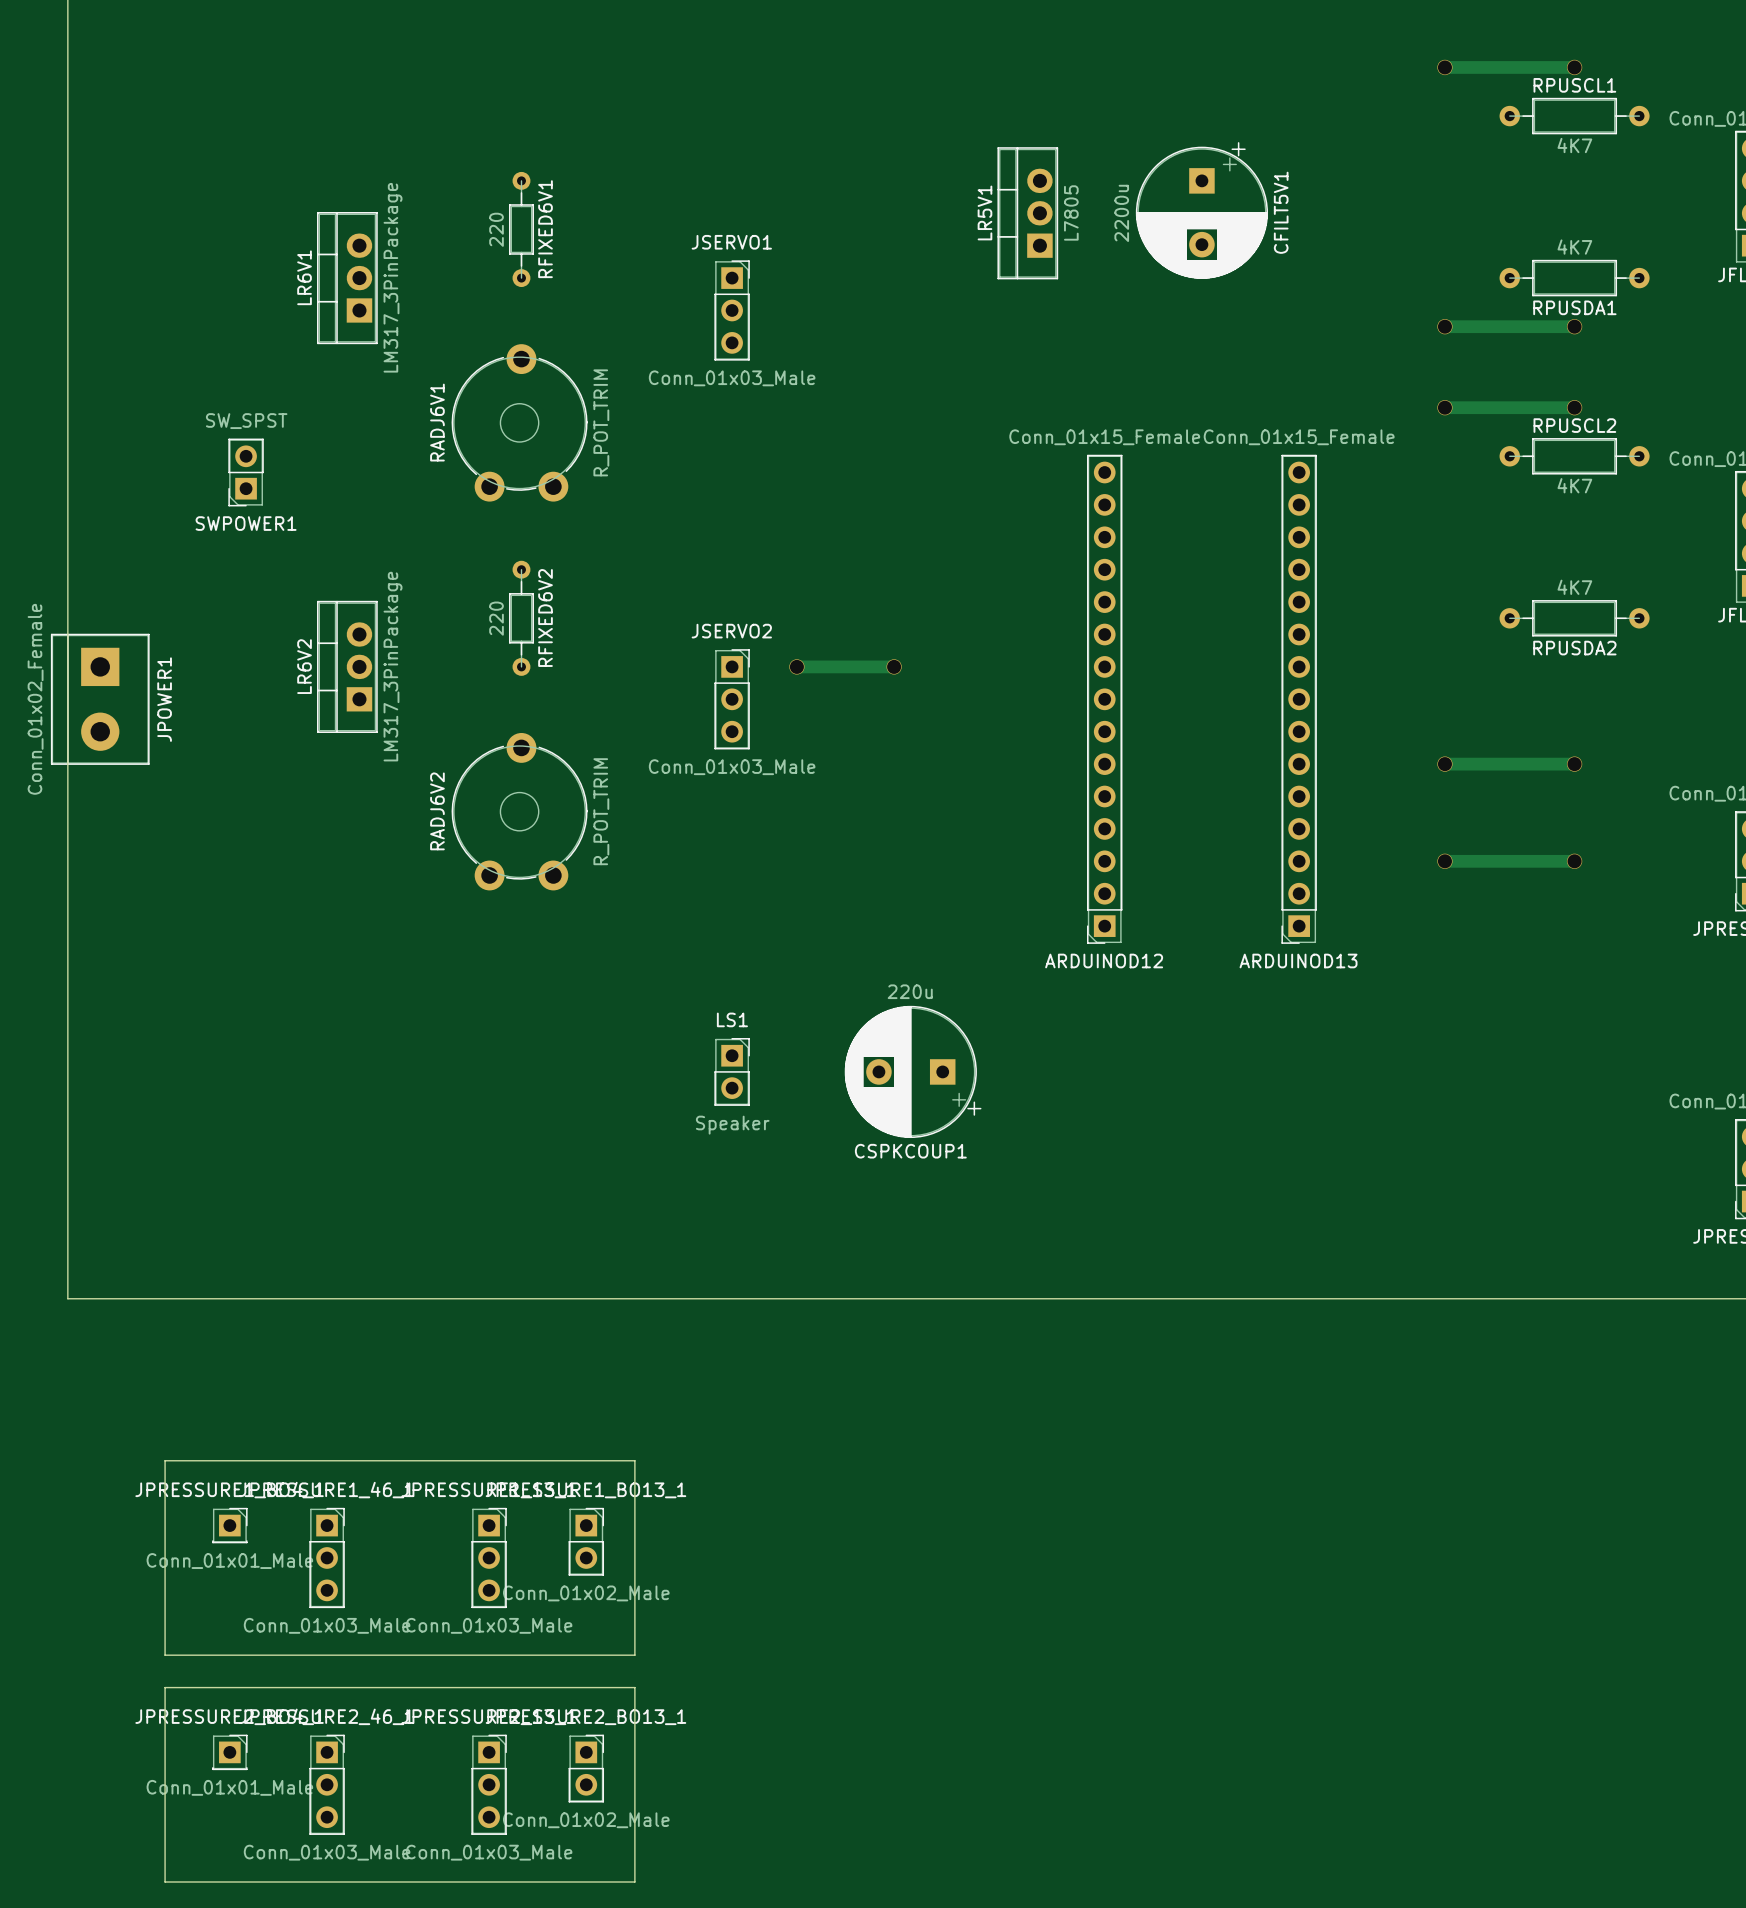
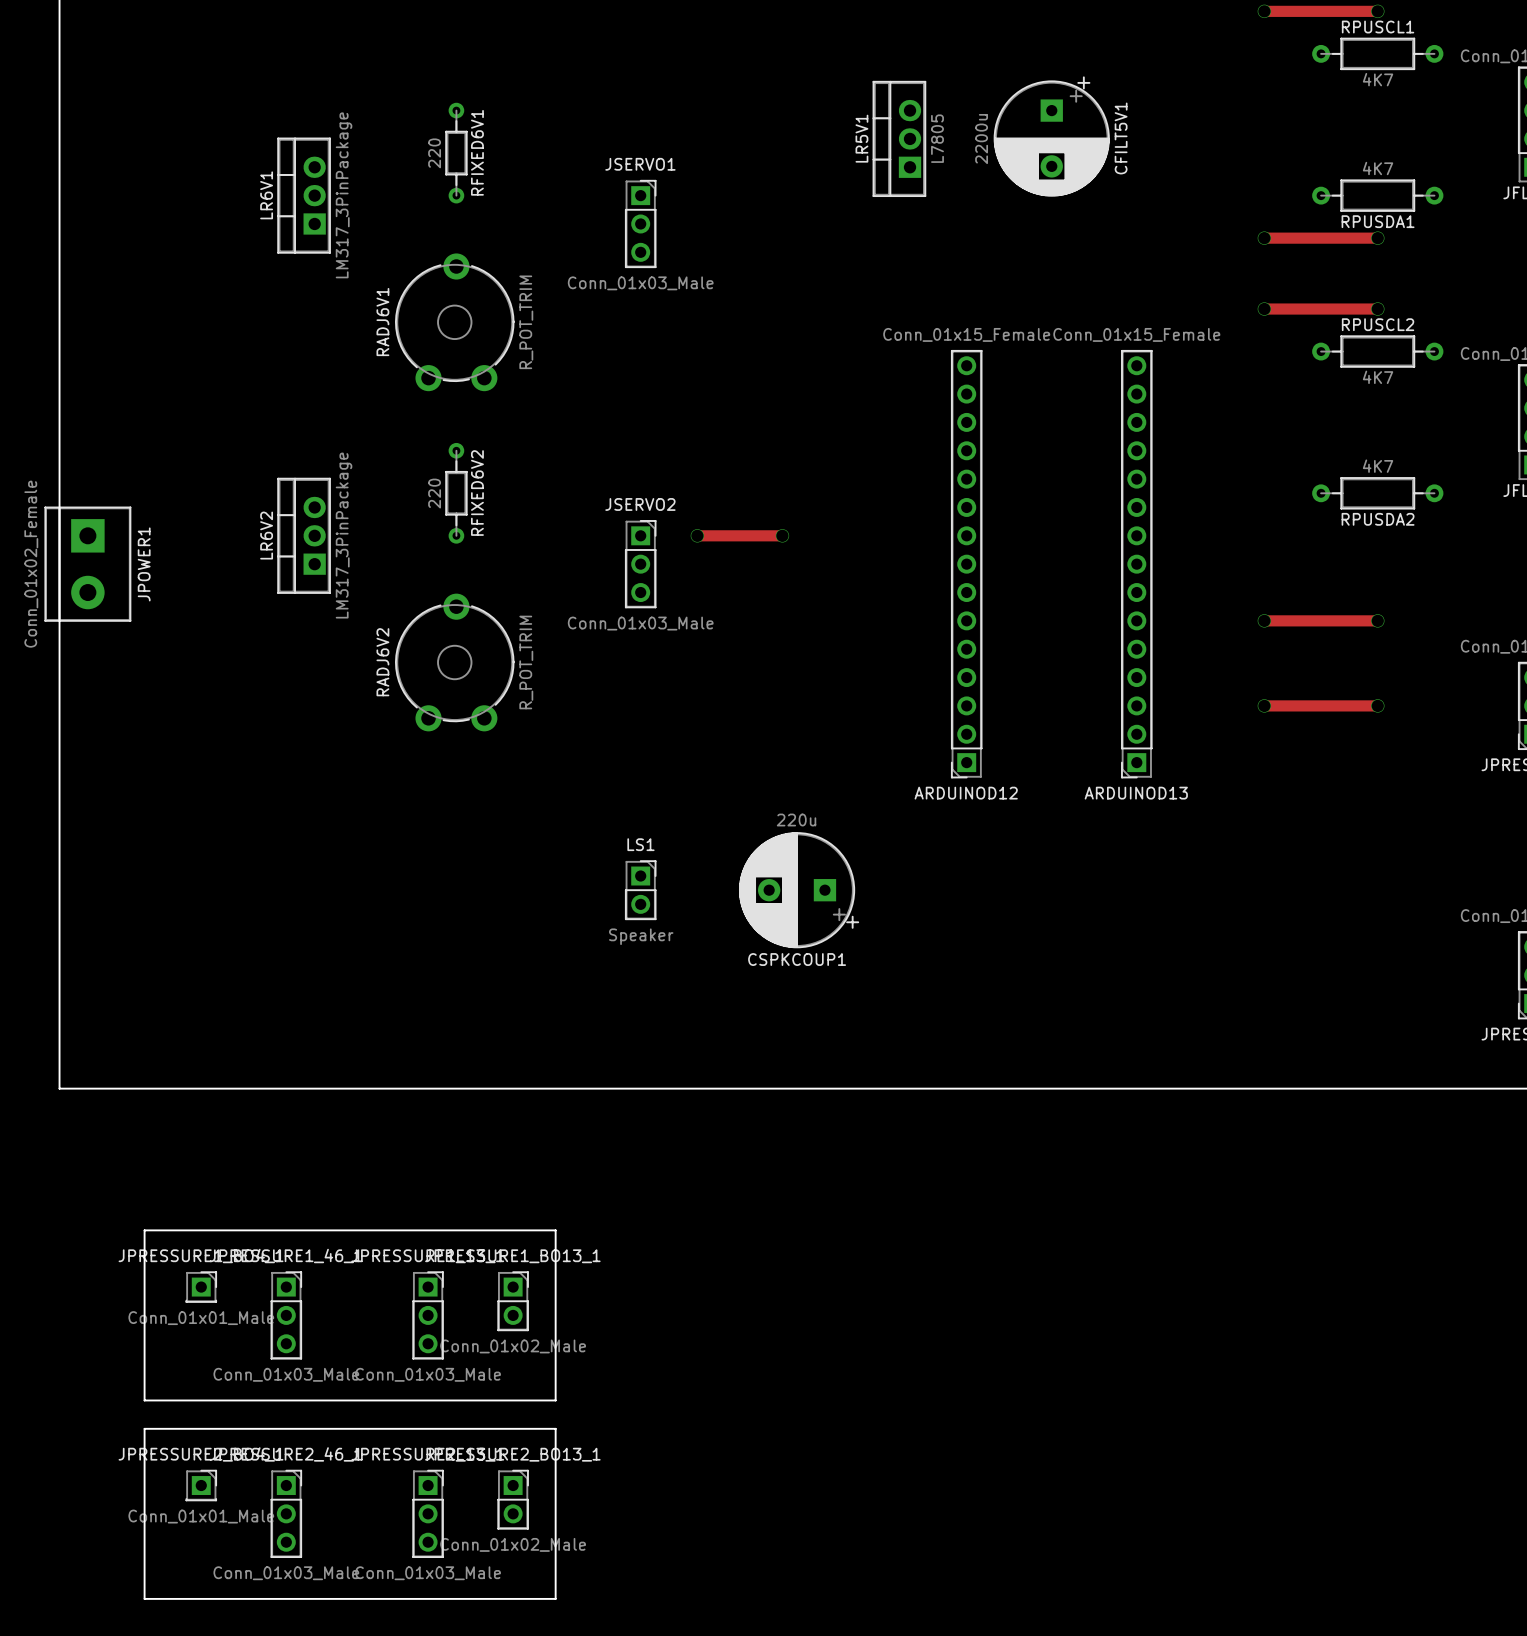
SWPOWER1: SW_SPST (246, 472) -> none

